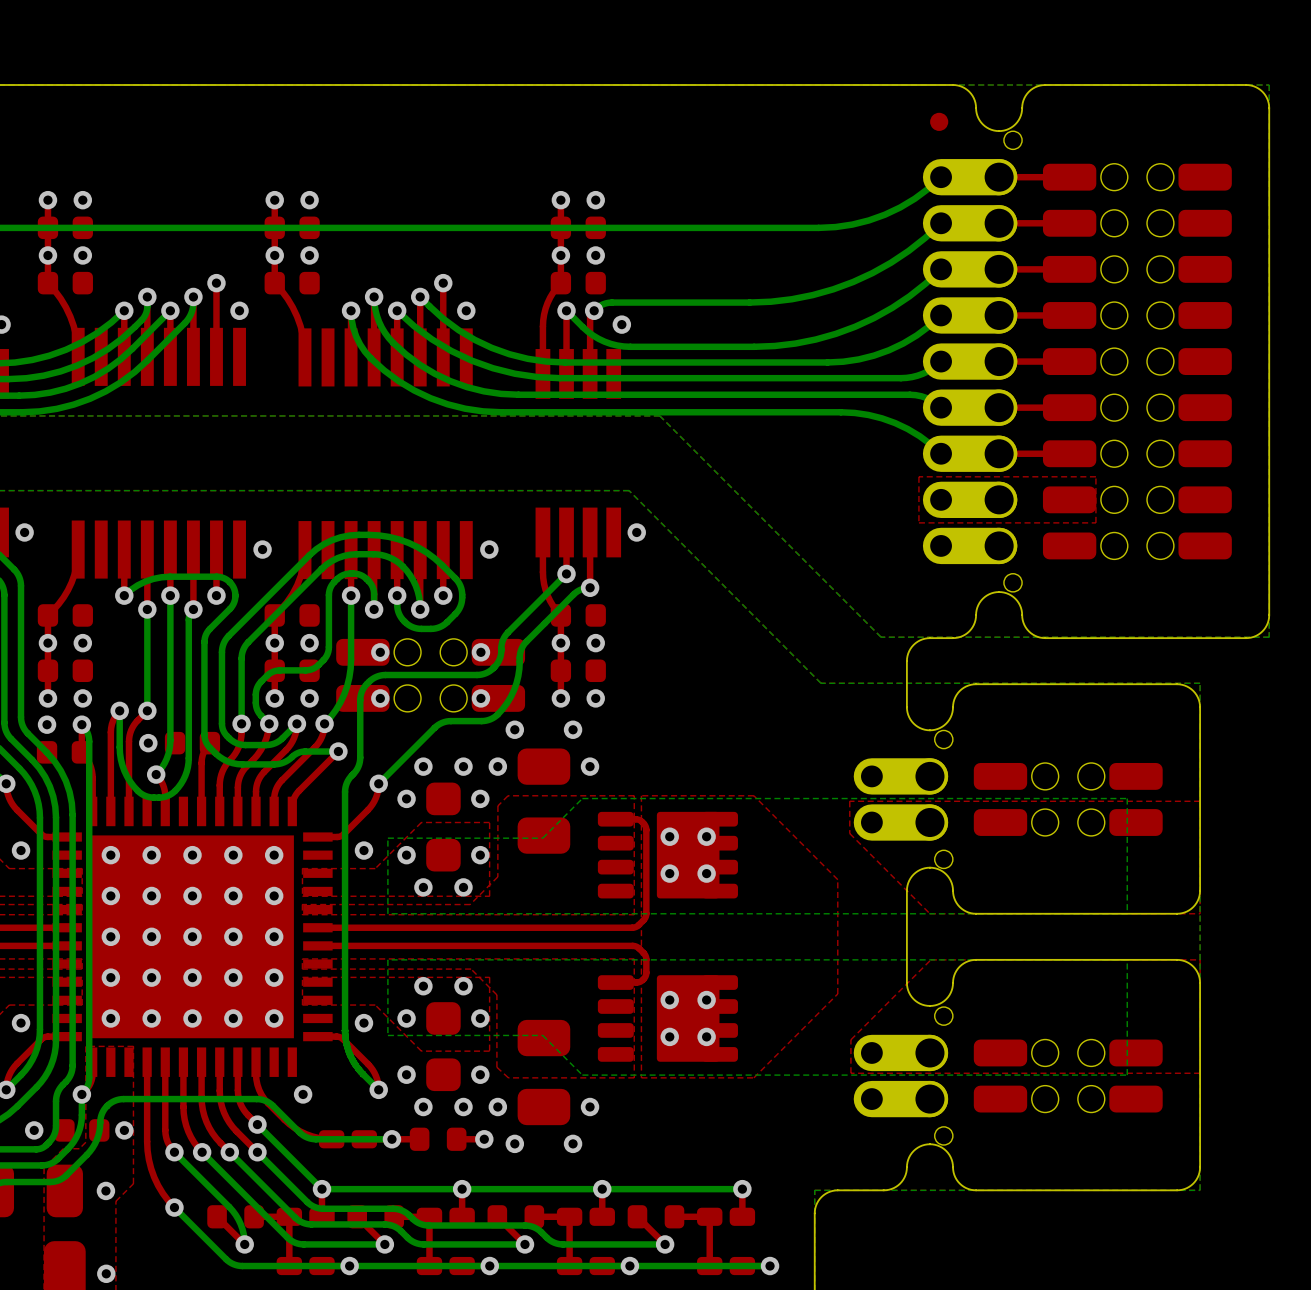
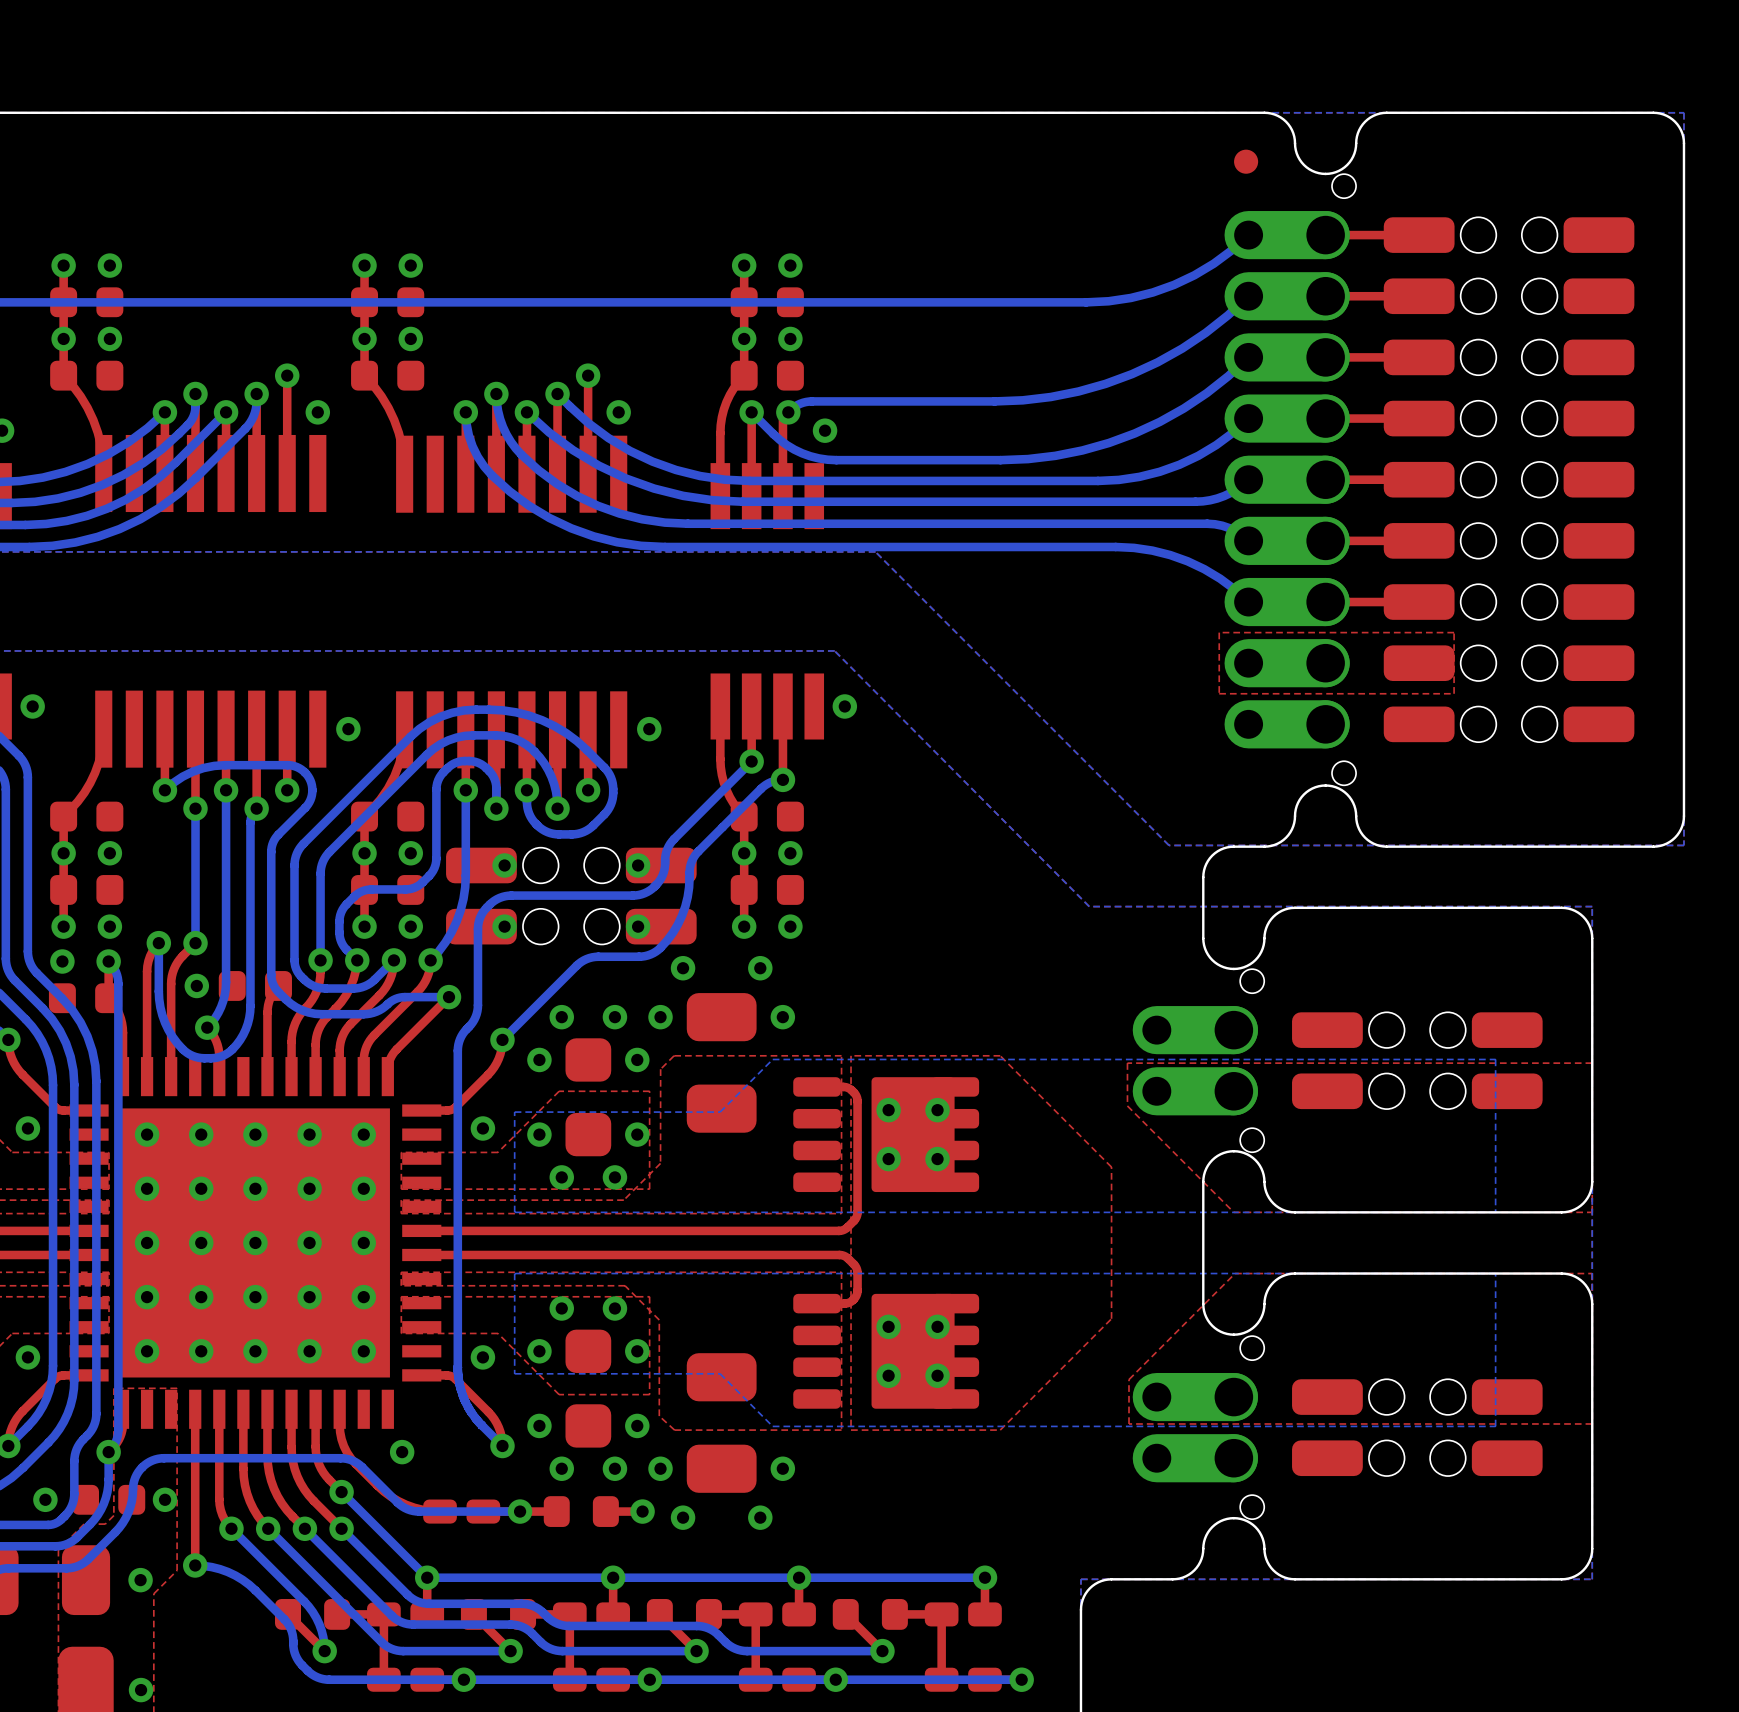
top track: (147, 1141) (148, 1159) (154, 1177) (162, 1193) (174, 1207) -> (195, 1514) (195, 1565)
bottom track: (174, 1207) (227, 1260) (235, 1265) (248, 1266) -> (195, 1565) (219, 1569) (235, 1575) (249, 1584) (288, 1623) (292, 1634) (294, 1652) (300, 1663) (314, 1676) (329, 1679)
via position: (174, 1207) -> (195, 1565)

